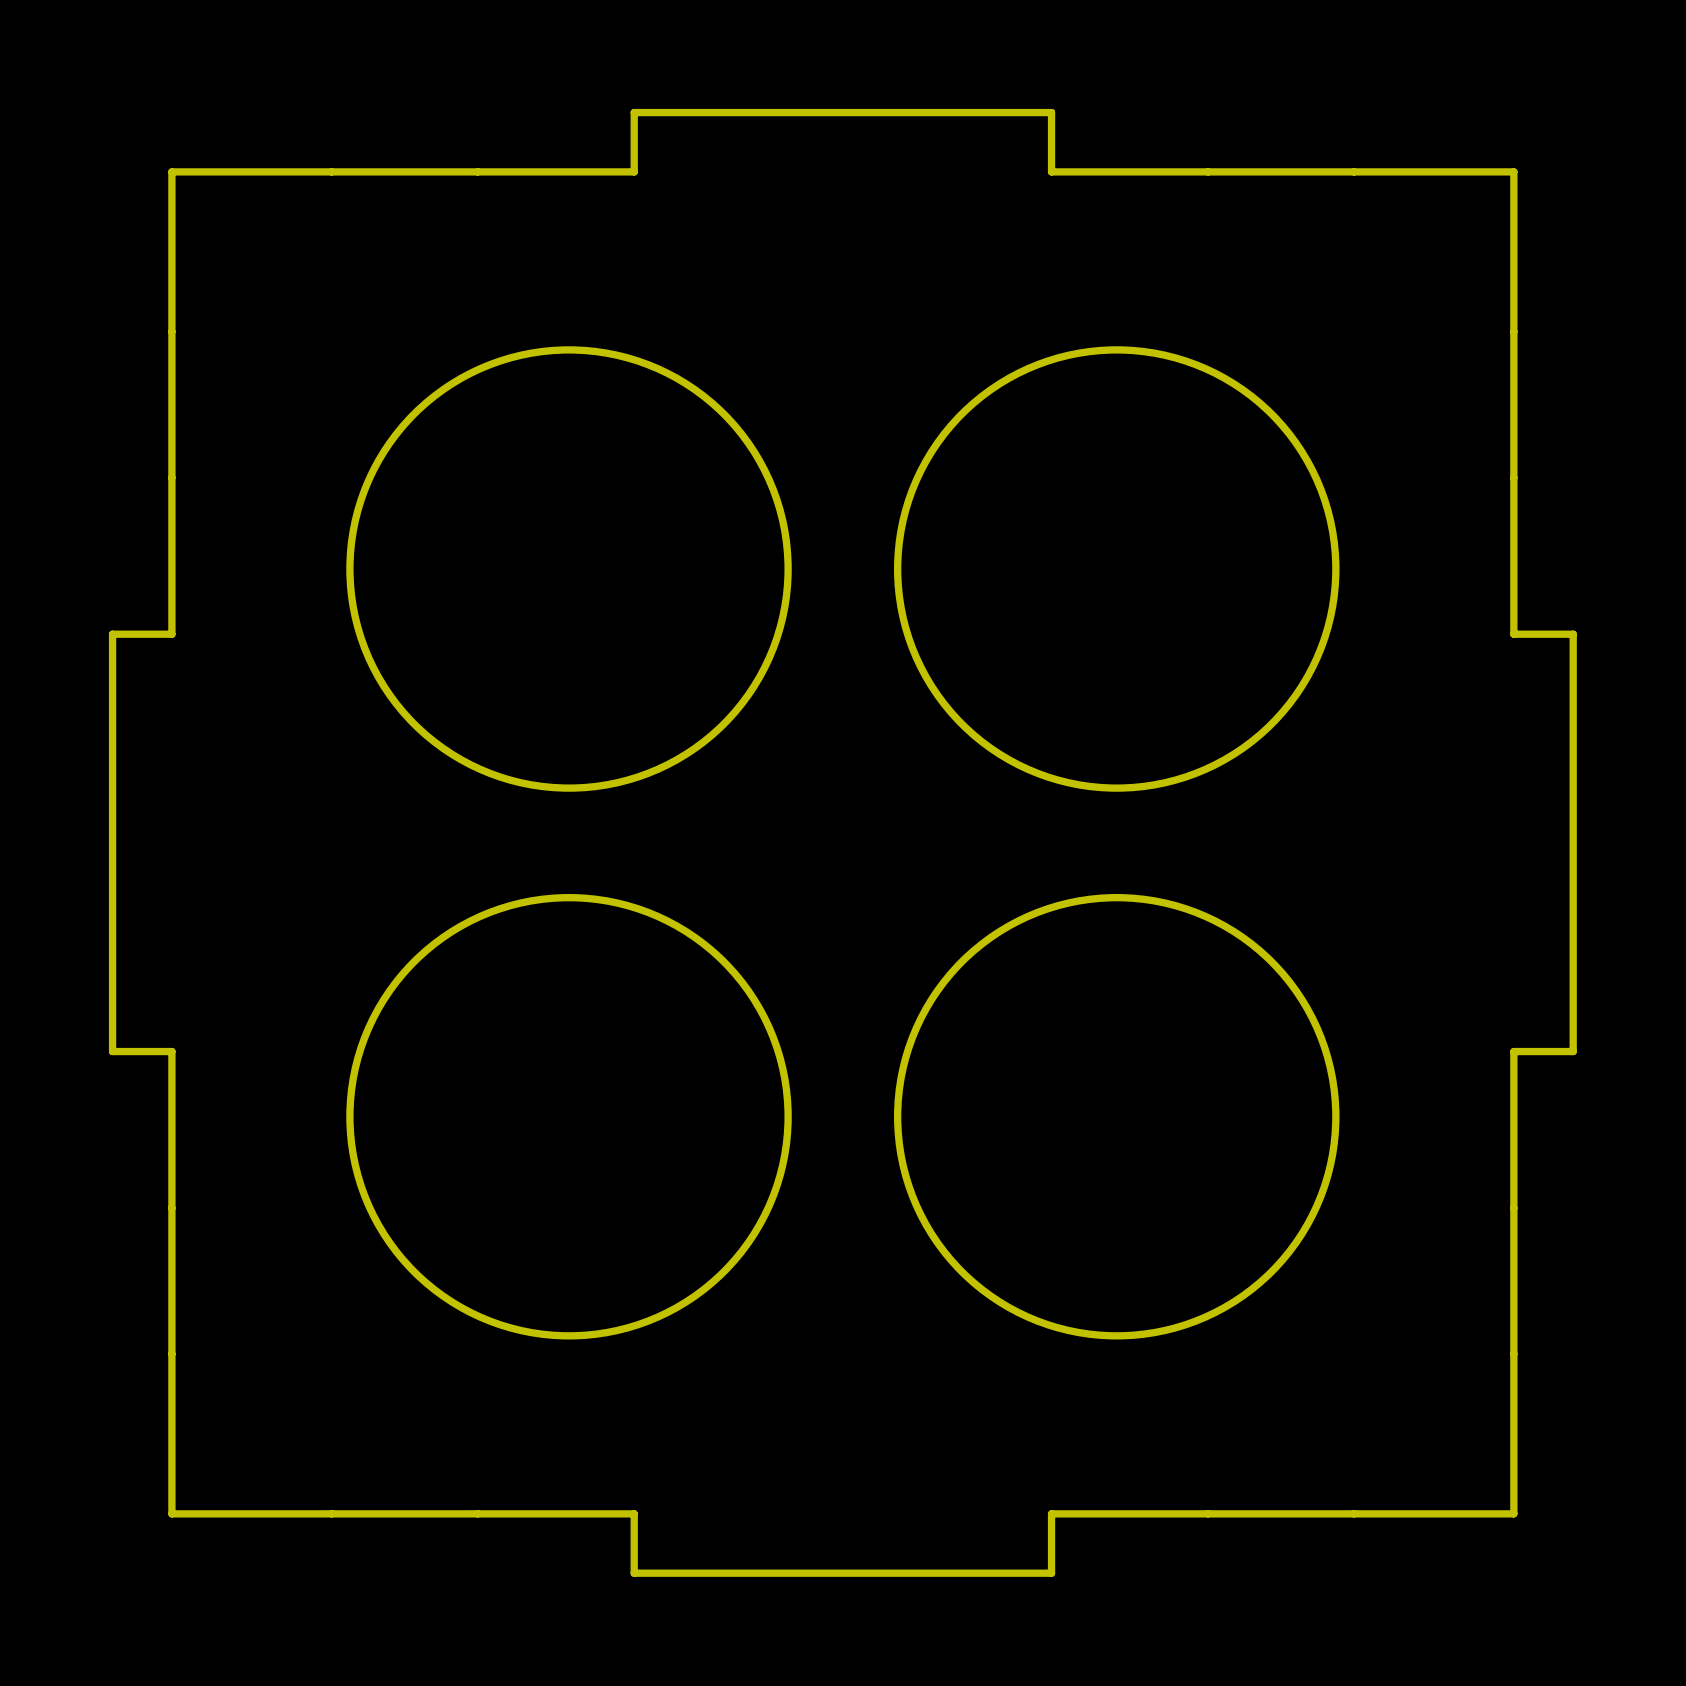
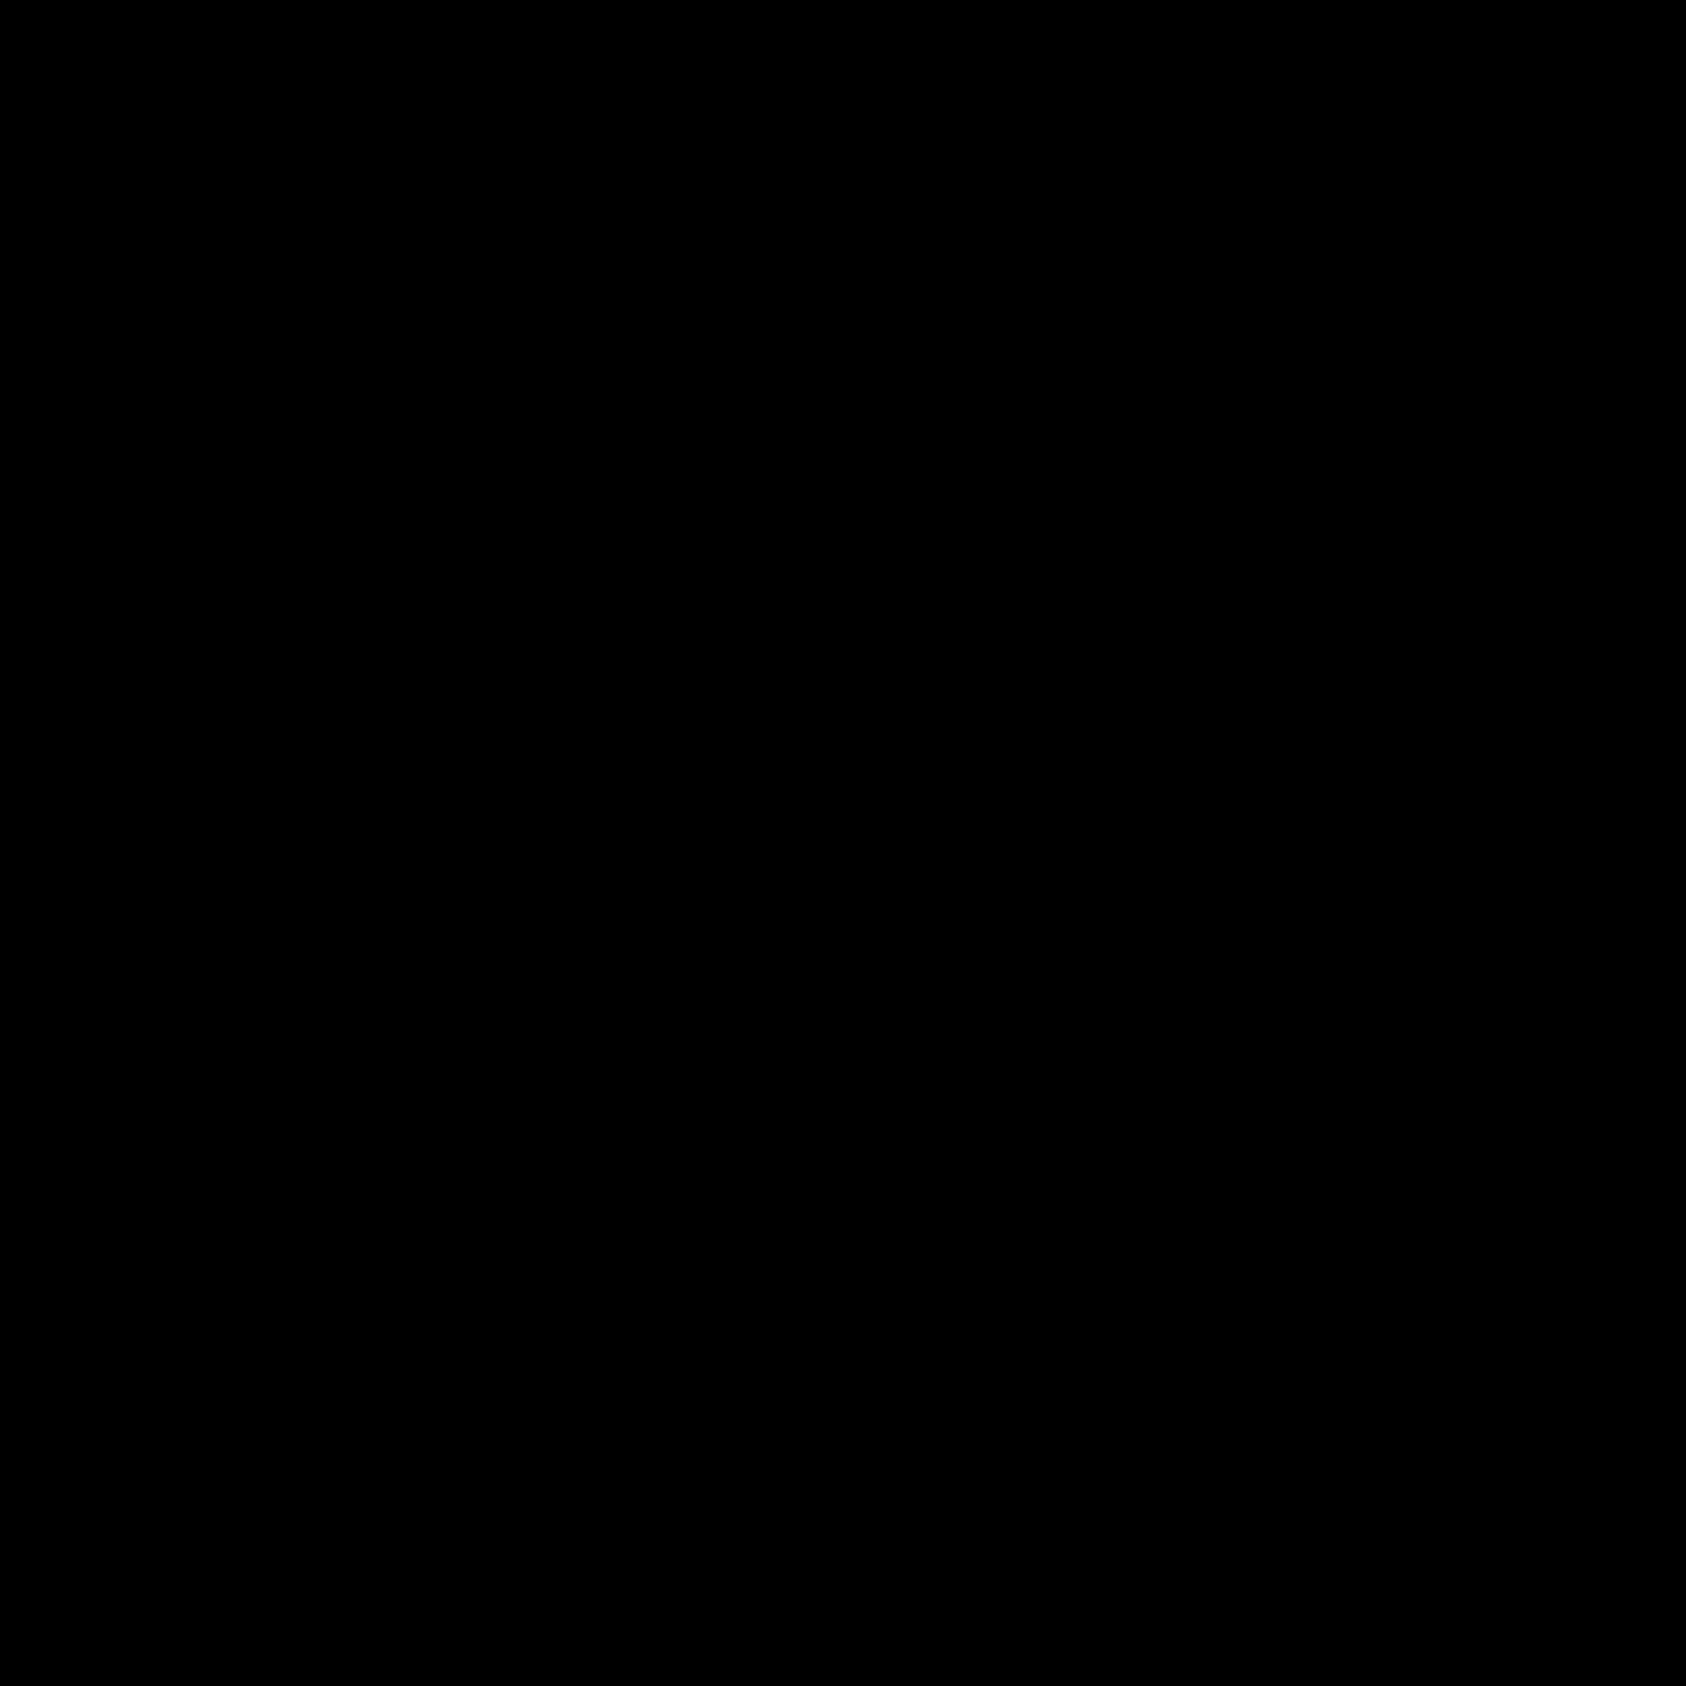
board edge: (1051, 112) (1051, 171) (1513, 171) (1513, 634) (1573, 634) (1573, 1051) (1513, 1051) (1513, 1513) (1051, 1513) (1051, 1573) (634, 1573) (634, 1513) (171, 1513) (171, 1051) (112, 1051) (112, 634) (171, 634) (171, 171) (634, 171) (634, 112) (1051, 112) -> none
round board edge: [346, 346, 792, 792] -> none
round board edge: [894, 346, 1340, 792] -> none
round board edge: [346, 894, 792, 1340] -> none
round board edge: [894, 894, 1340, 1340] -> none

